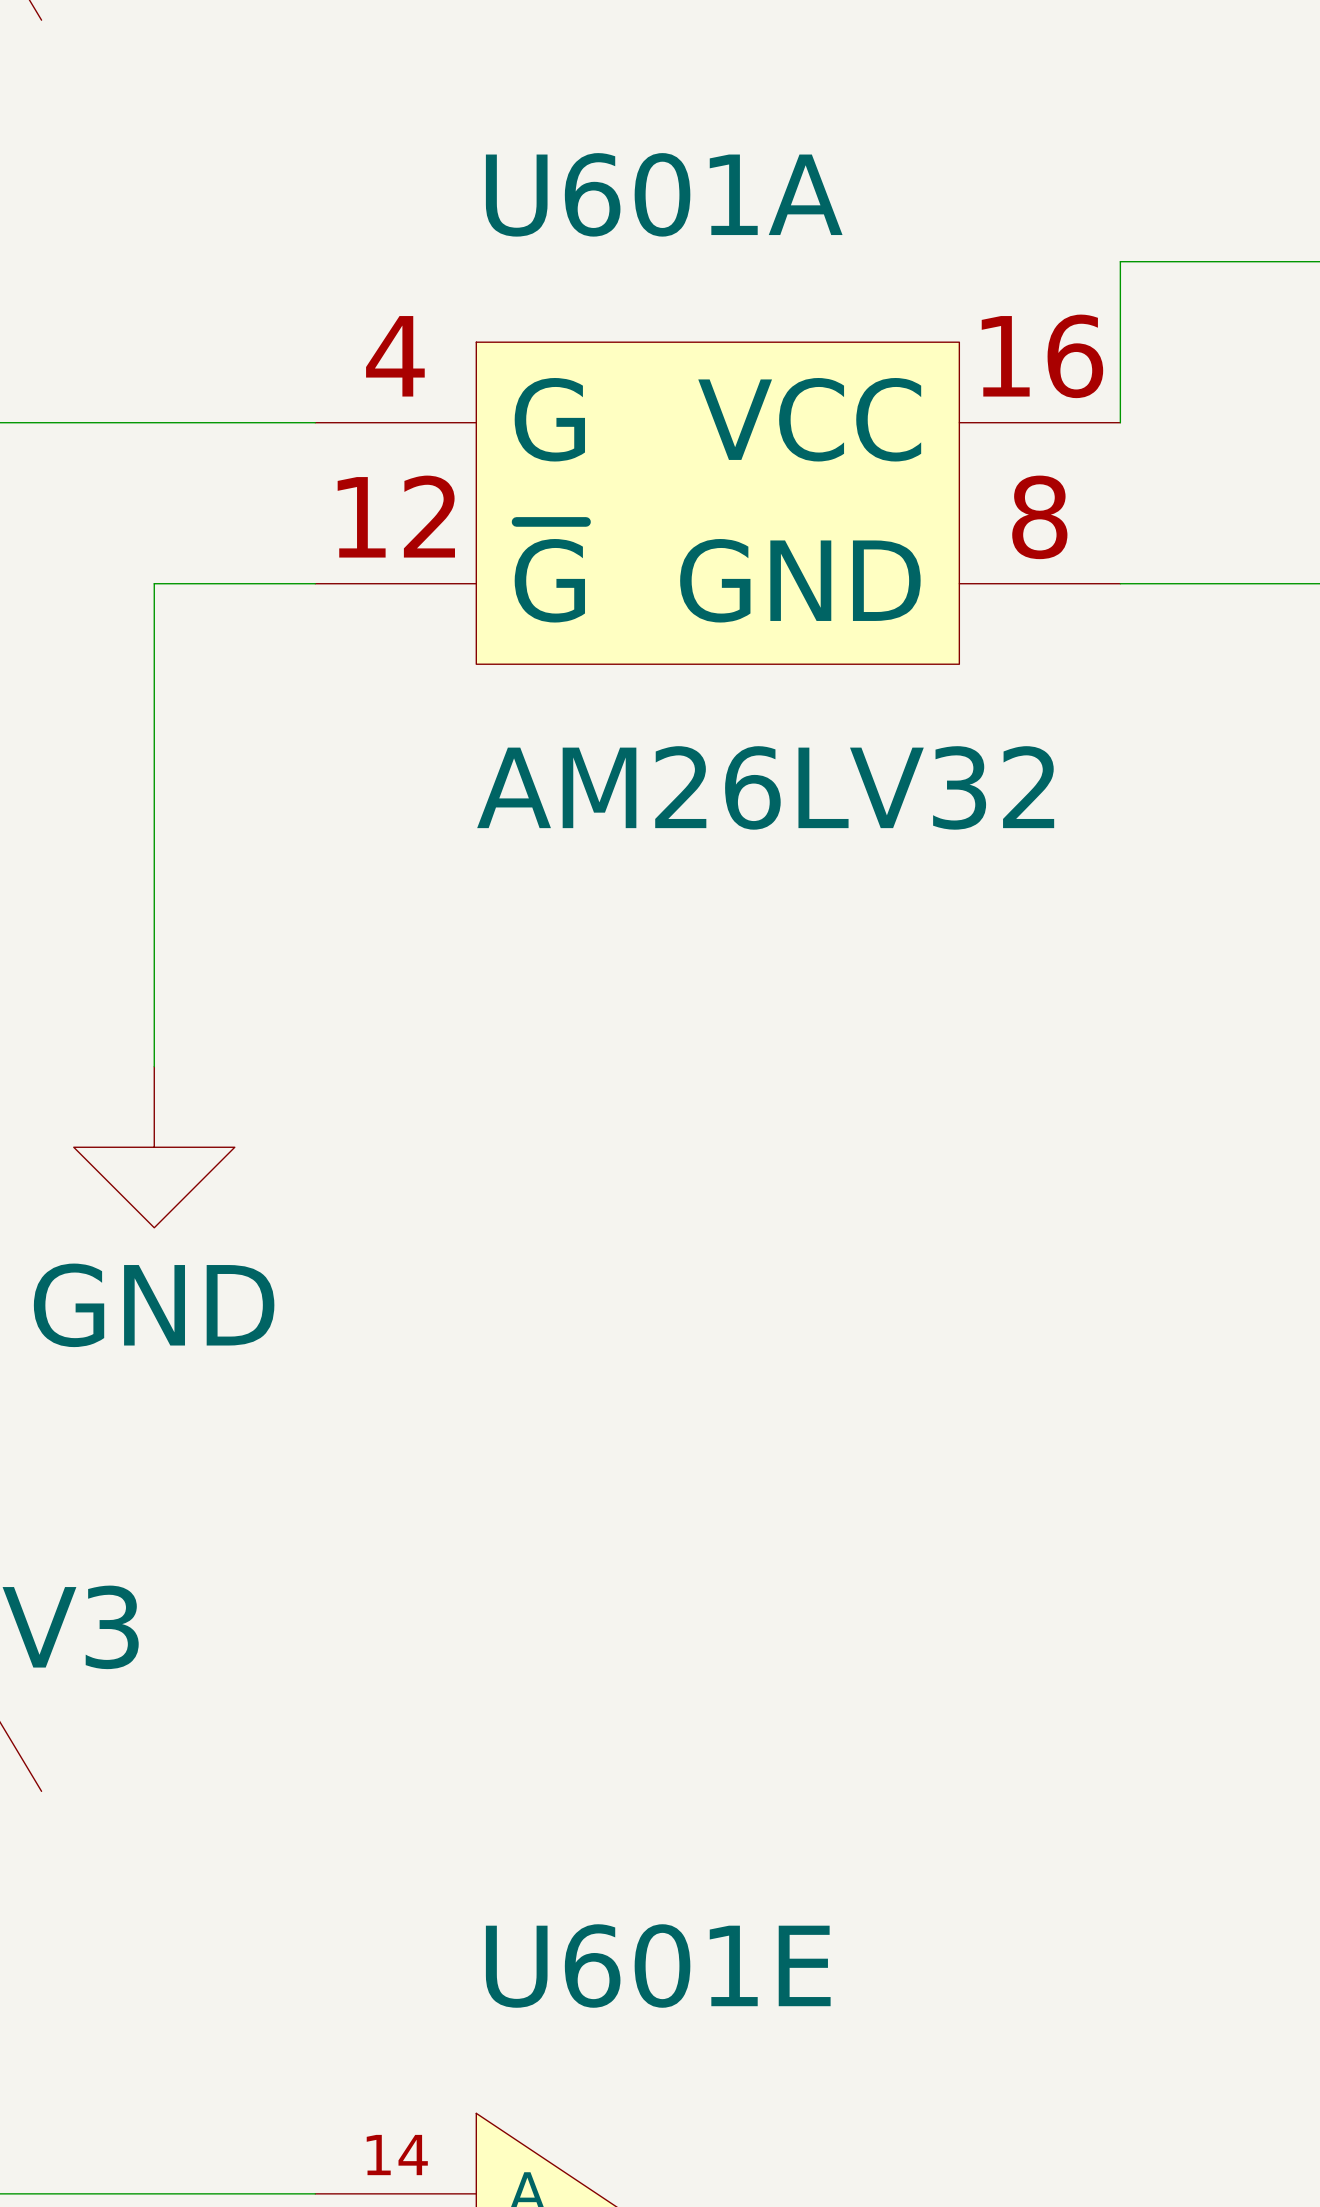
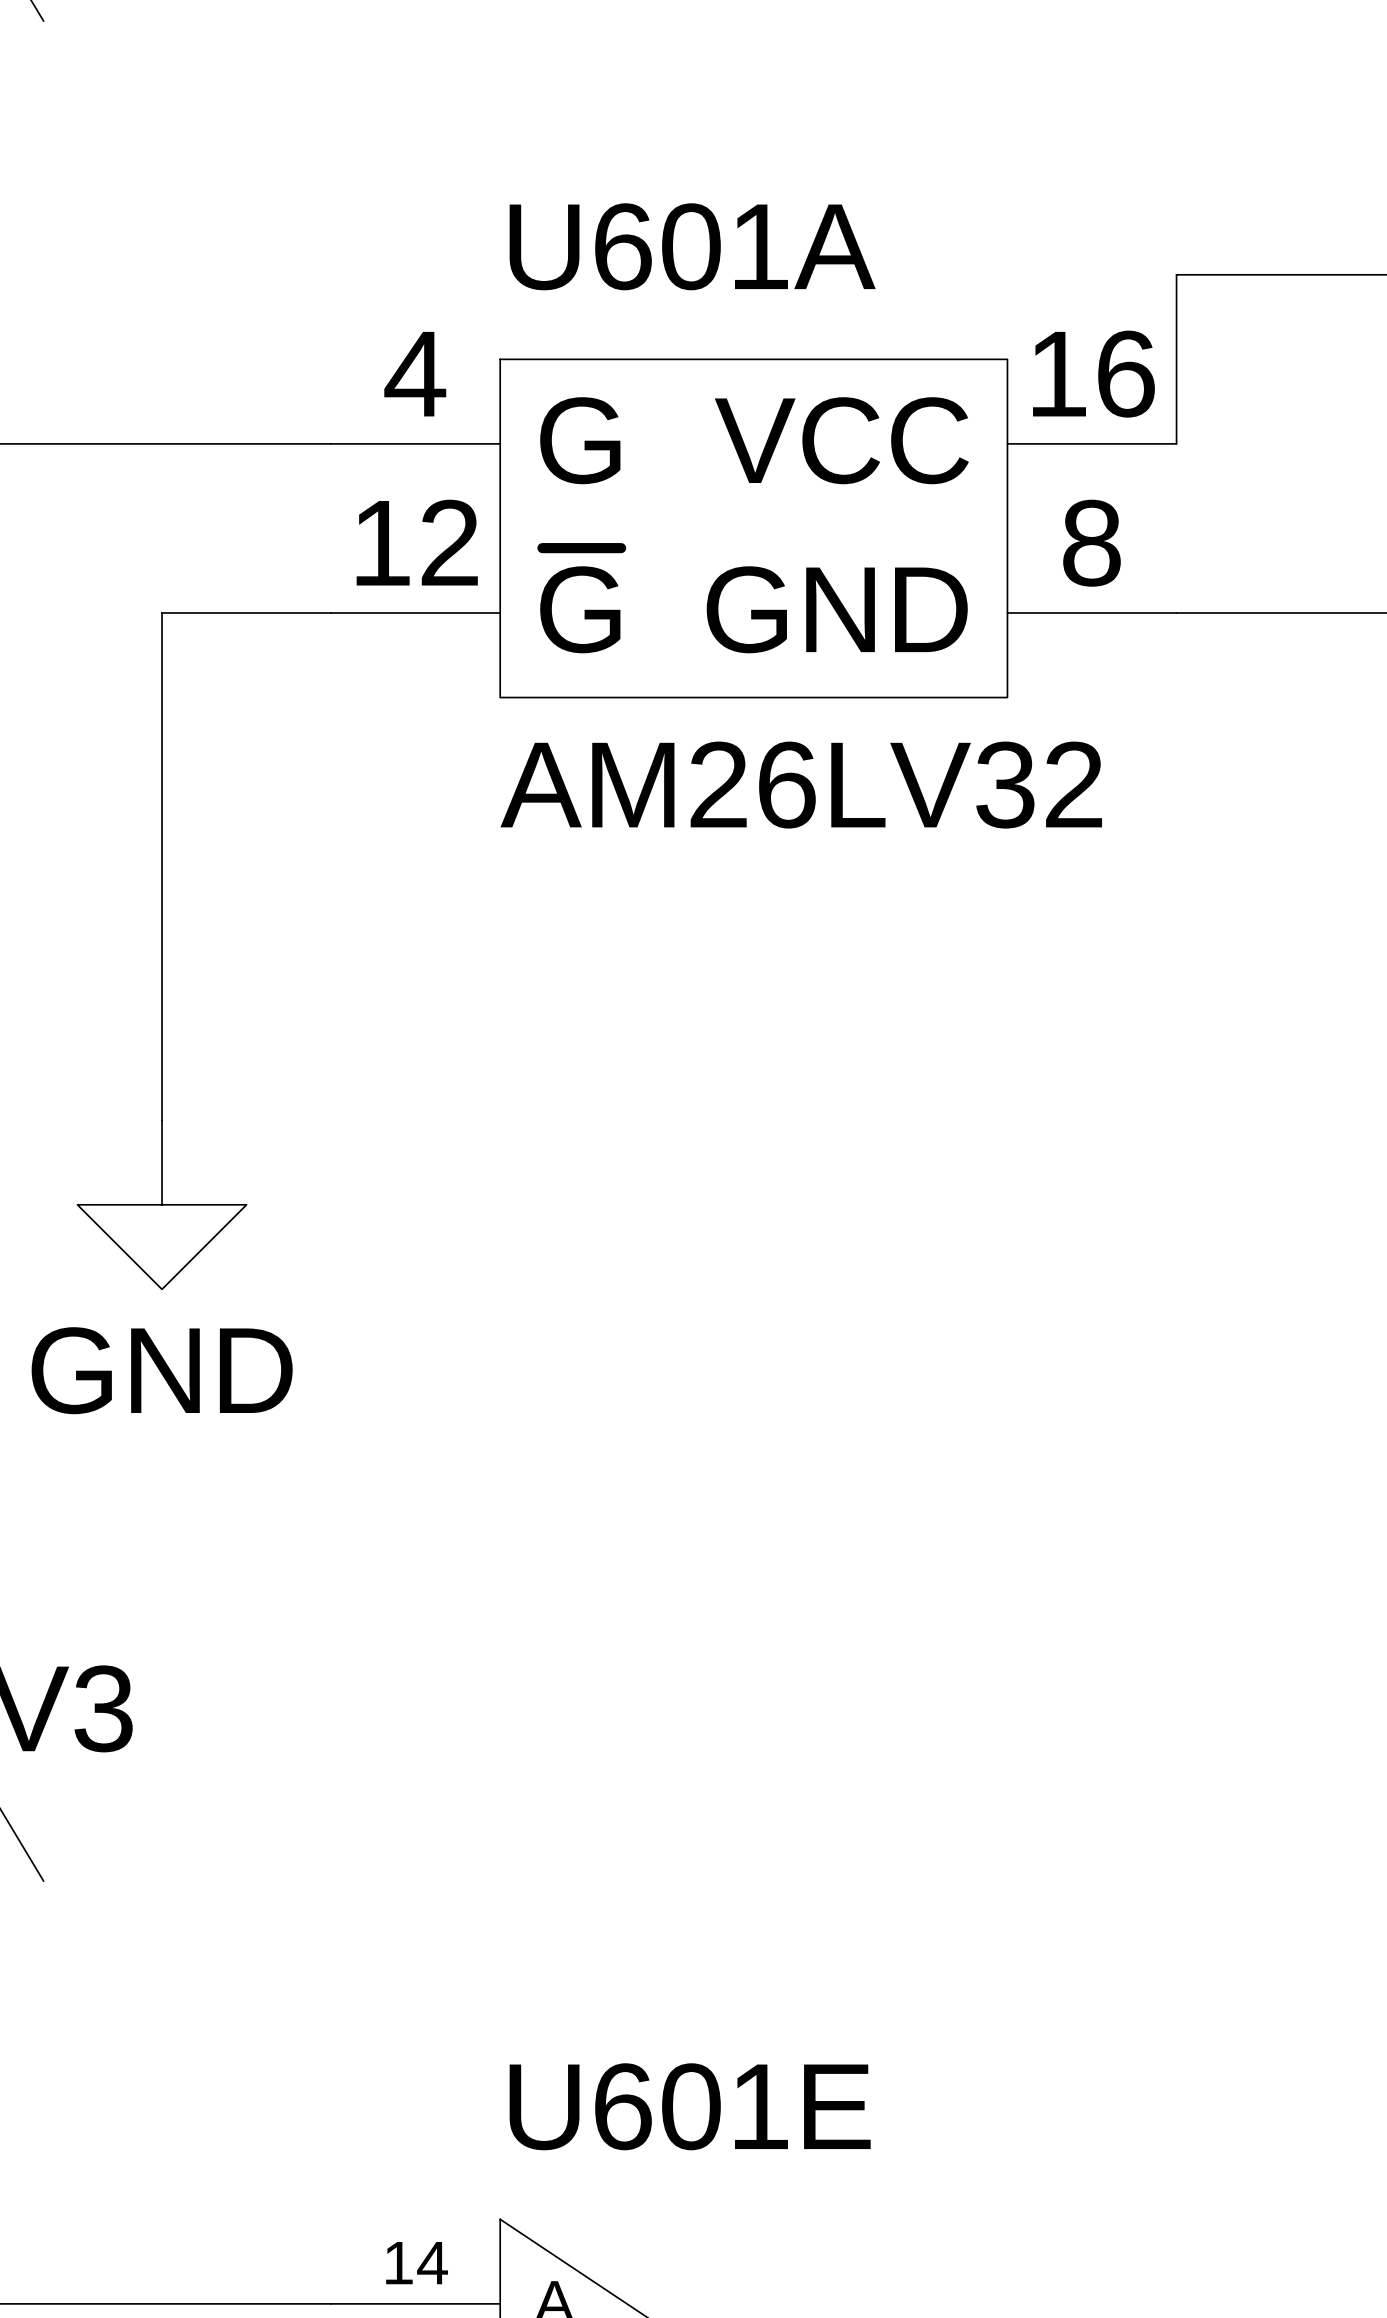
U601A name position: U601A (664, 194) -> U601A (692, 246)
U601A value position: AM26LV32 (765, 787) -> AM26LV32 (801, 785)
U601E name position: U601E (658, 1966) -> U601E (690, 2106)

